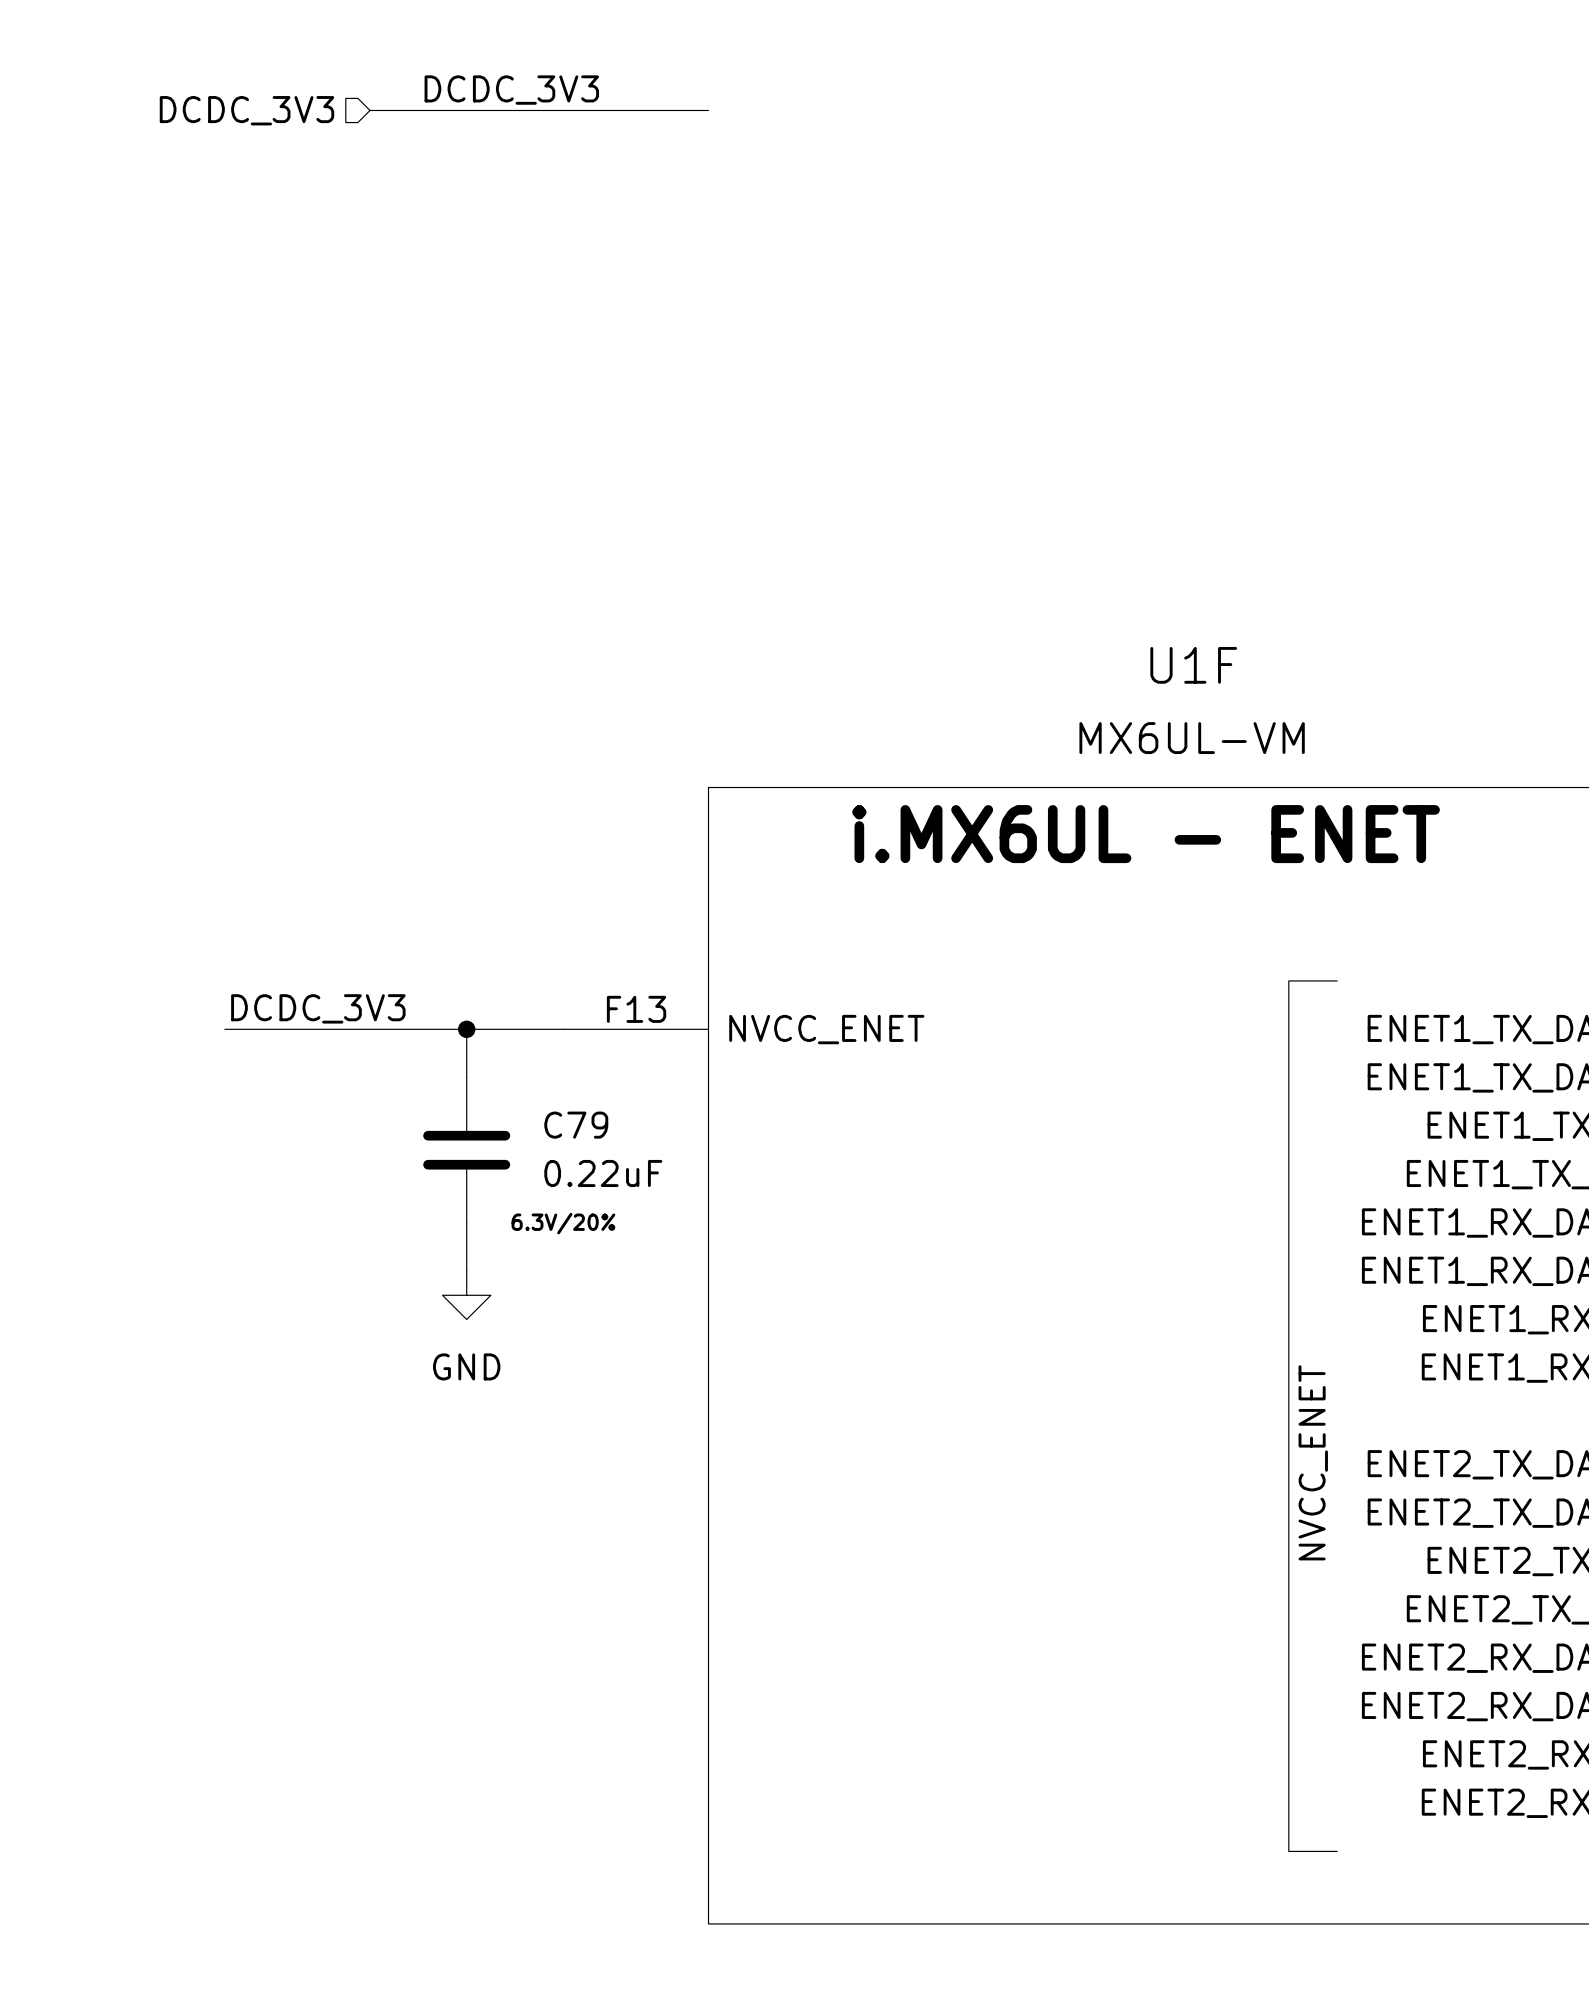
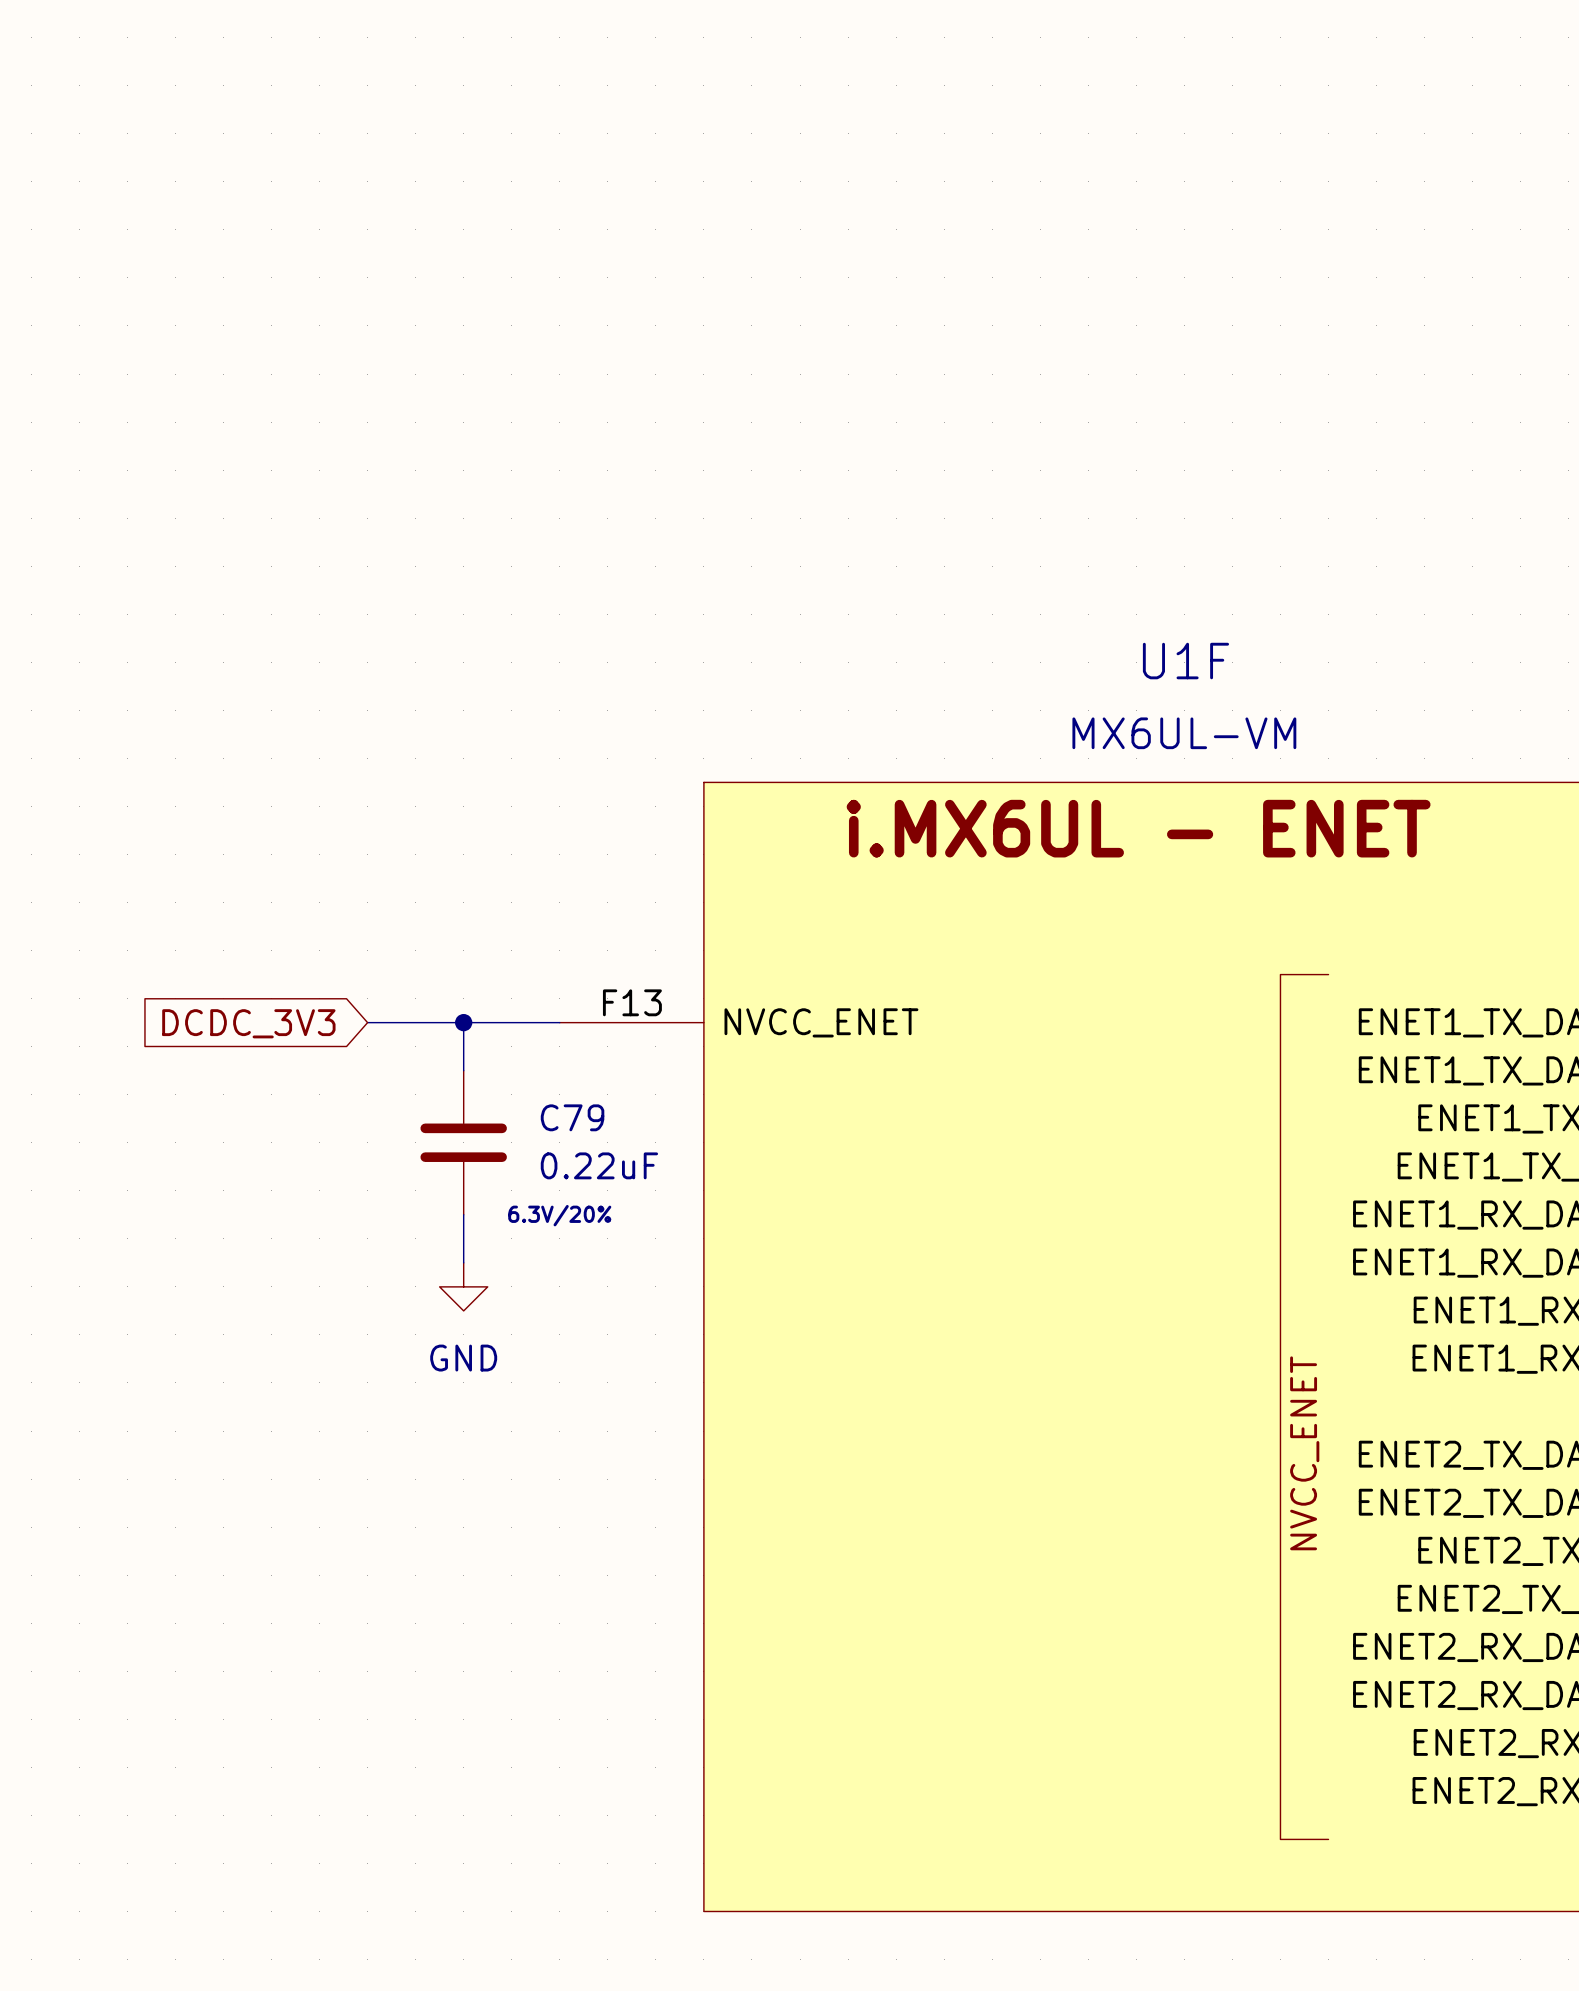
label: DCDC_3V3 (511, 90) -> none
hierarchical label: DCDC_3V3 (246, 110) -> none
wire: (369, 110) (708, 110) -> none
label: DCDC_3V3 (318, 1008) -> none
wire: (224, 1029) (369, 1029) -> none
global label: none -> DCDC_3V3 (248, 1023)

